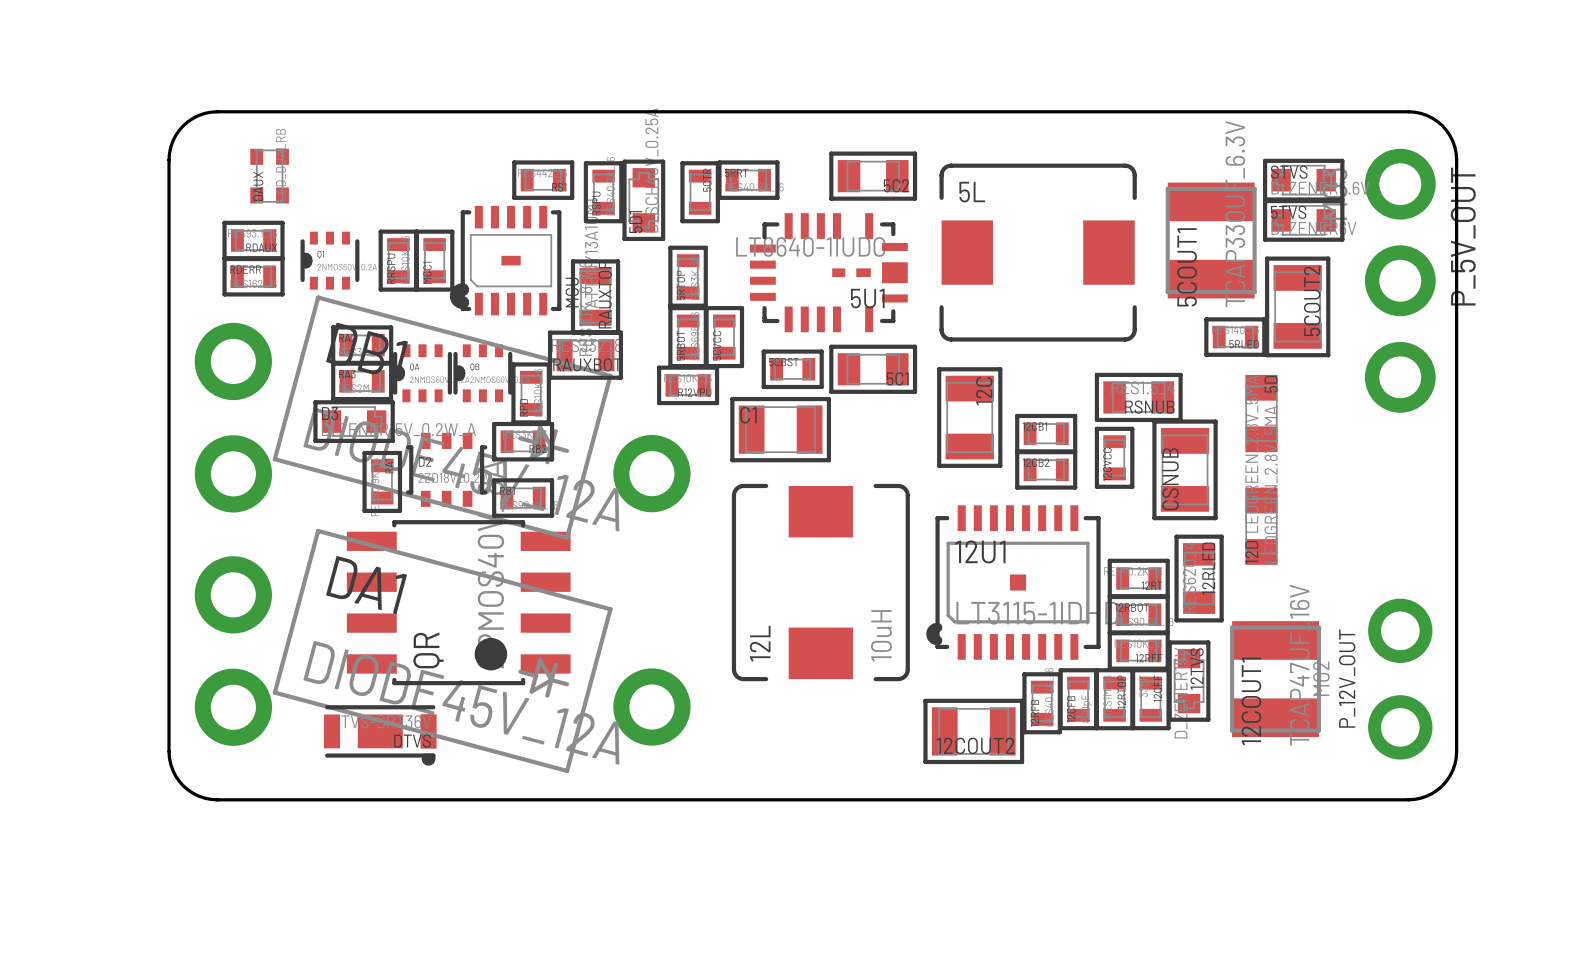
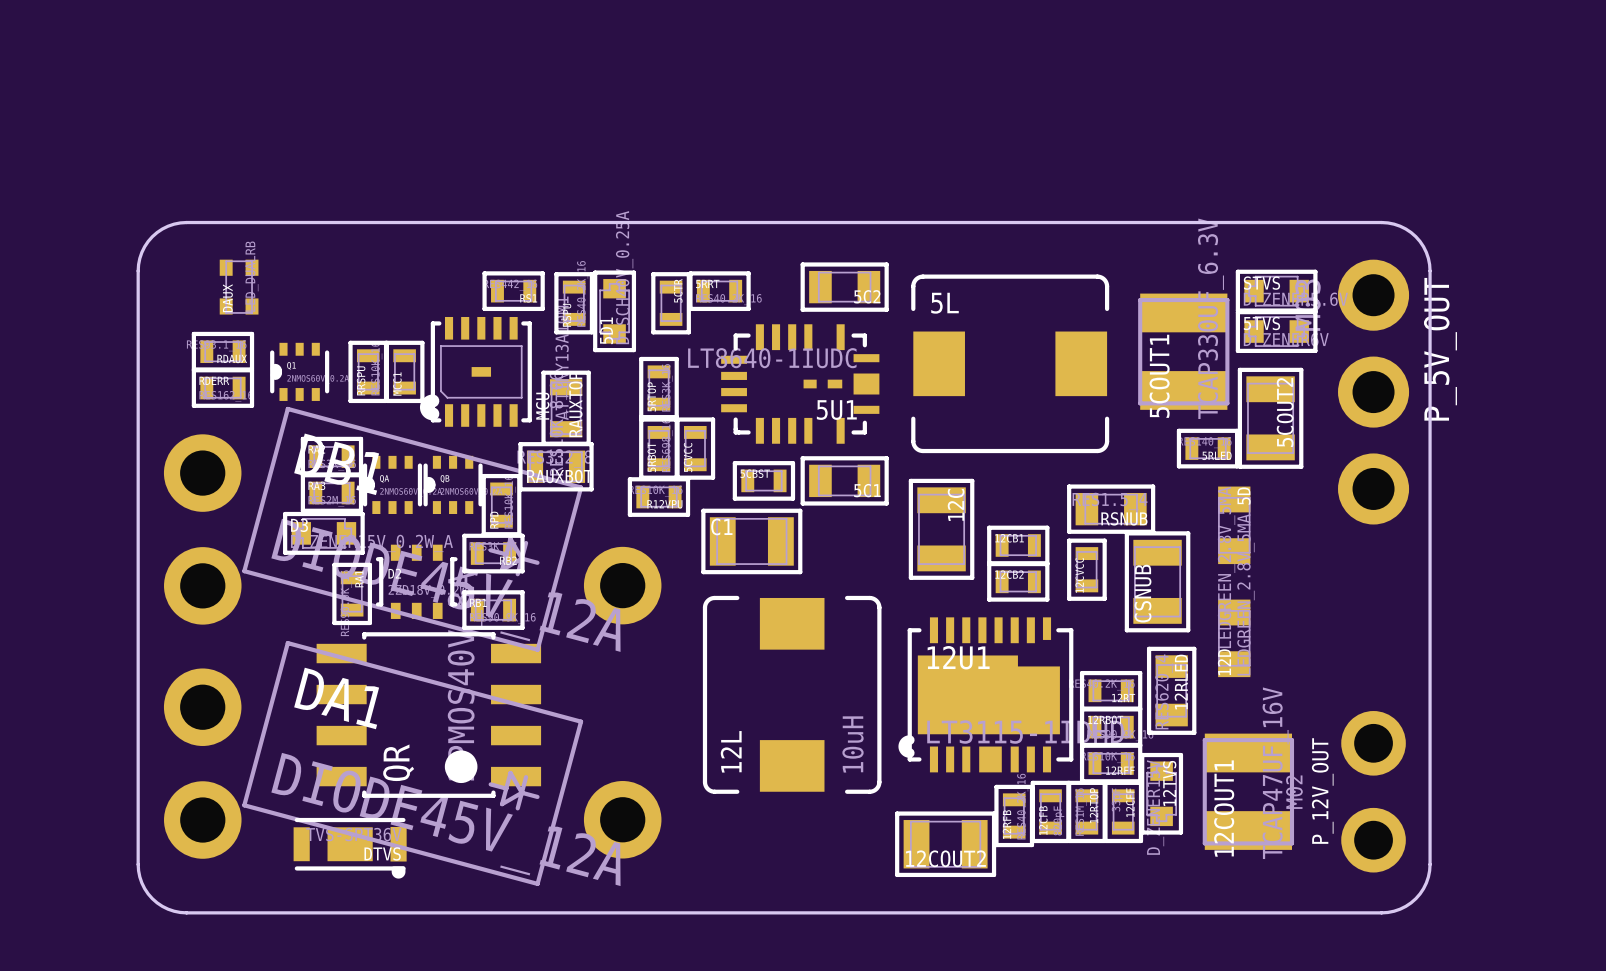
12U1 footprint: [926, 505, 1101, 660] -> [898, 617, 1074, 773]

